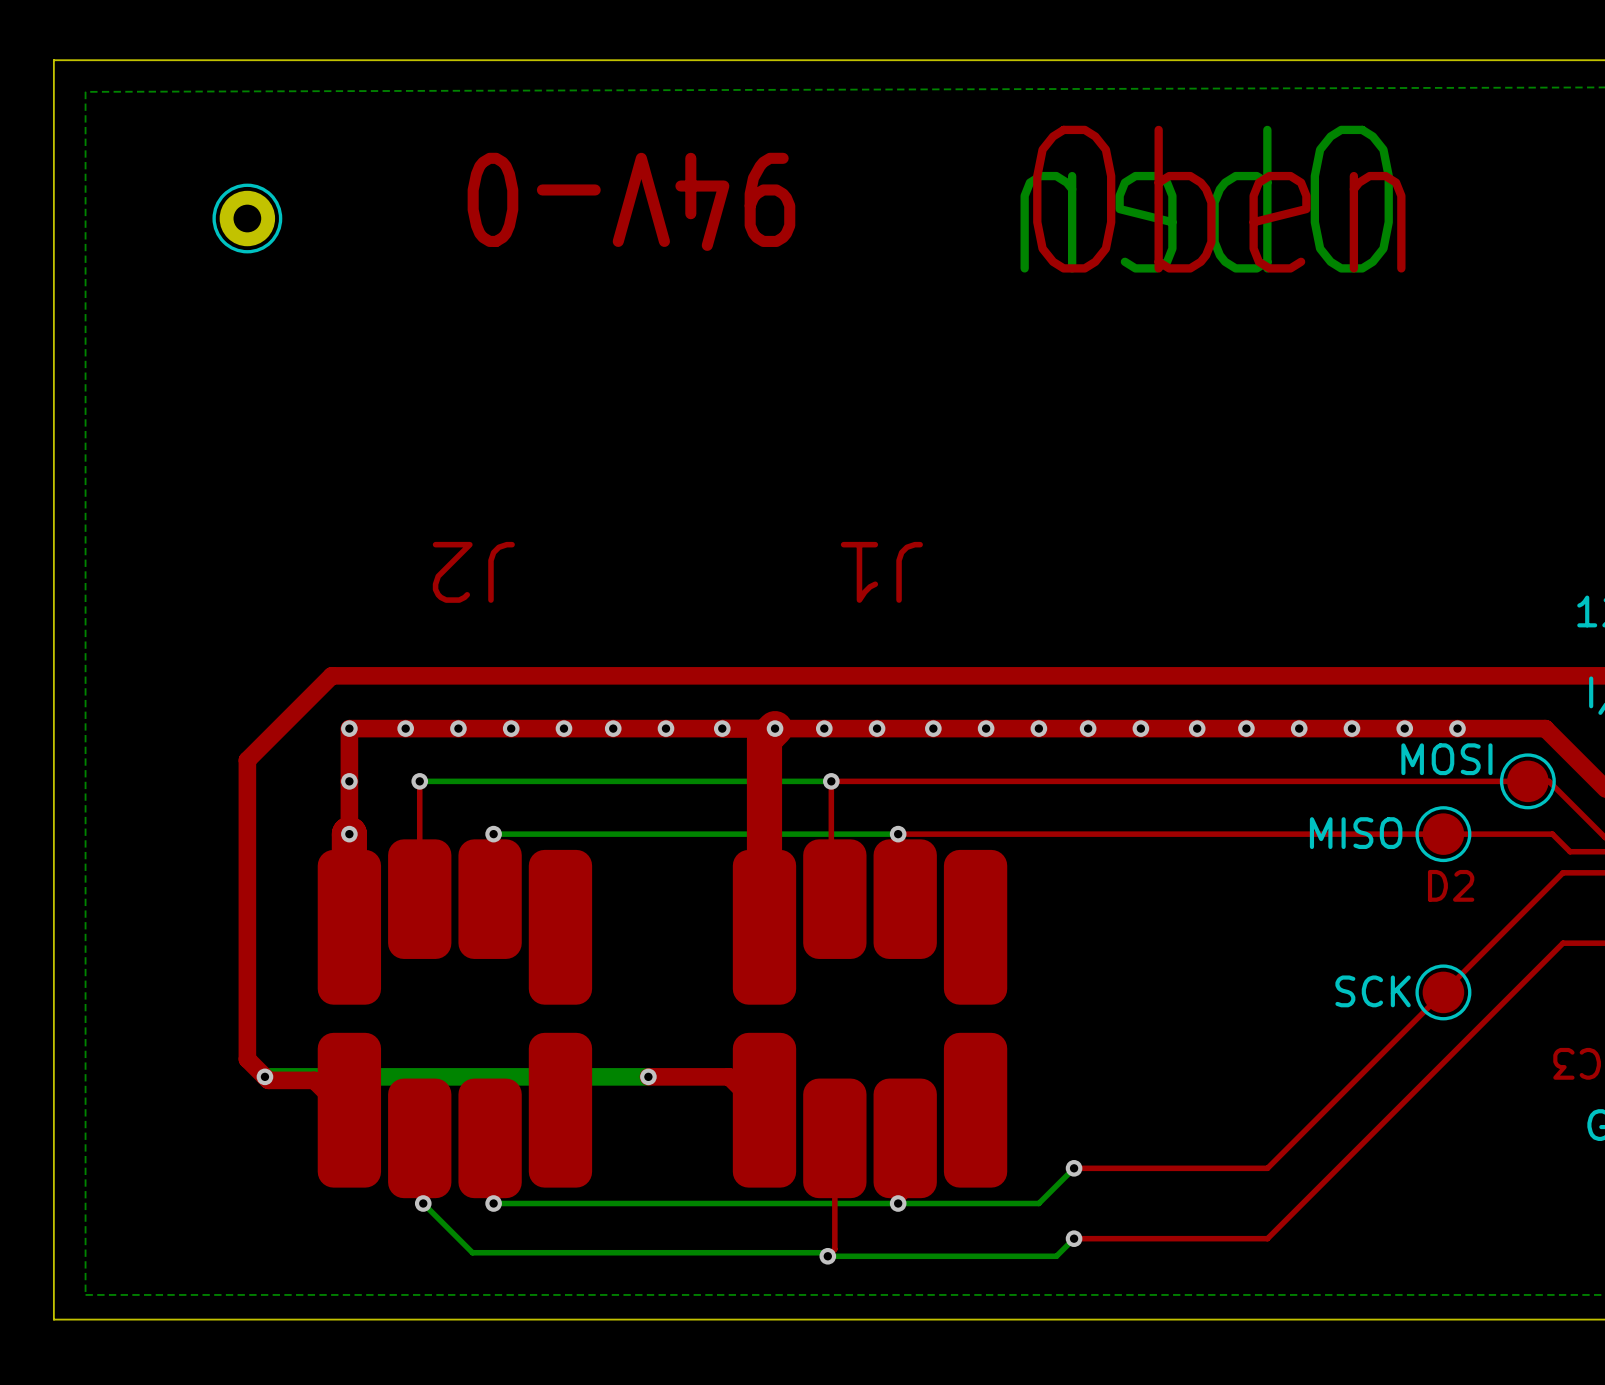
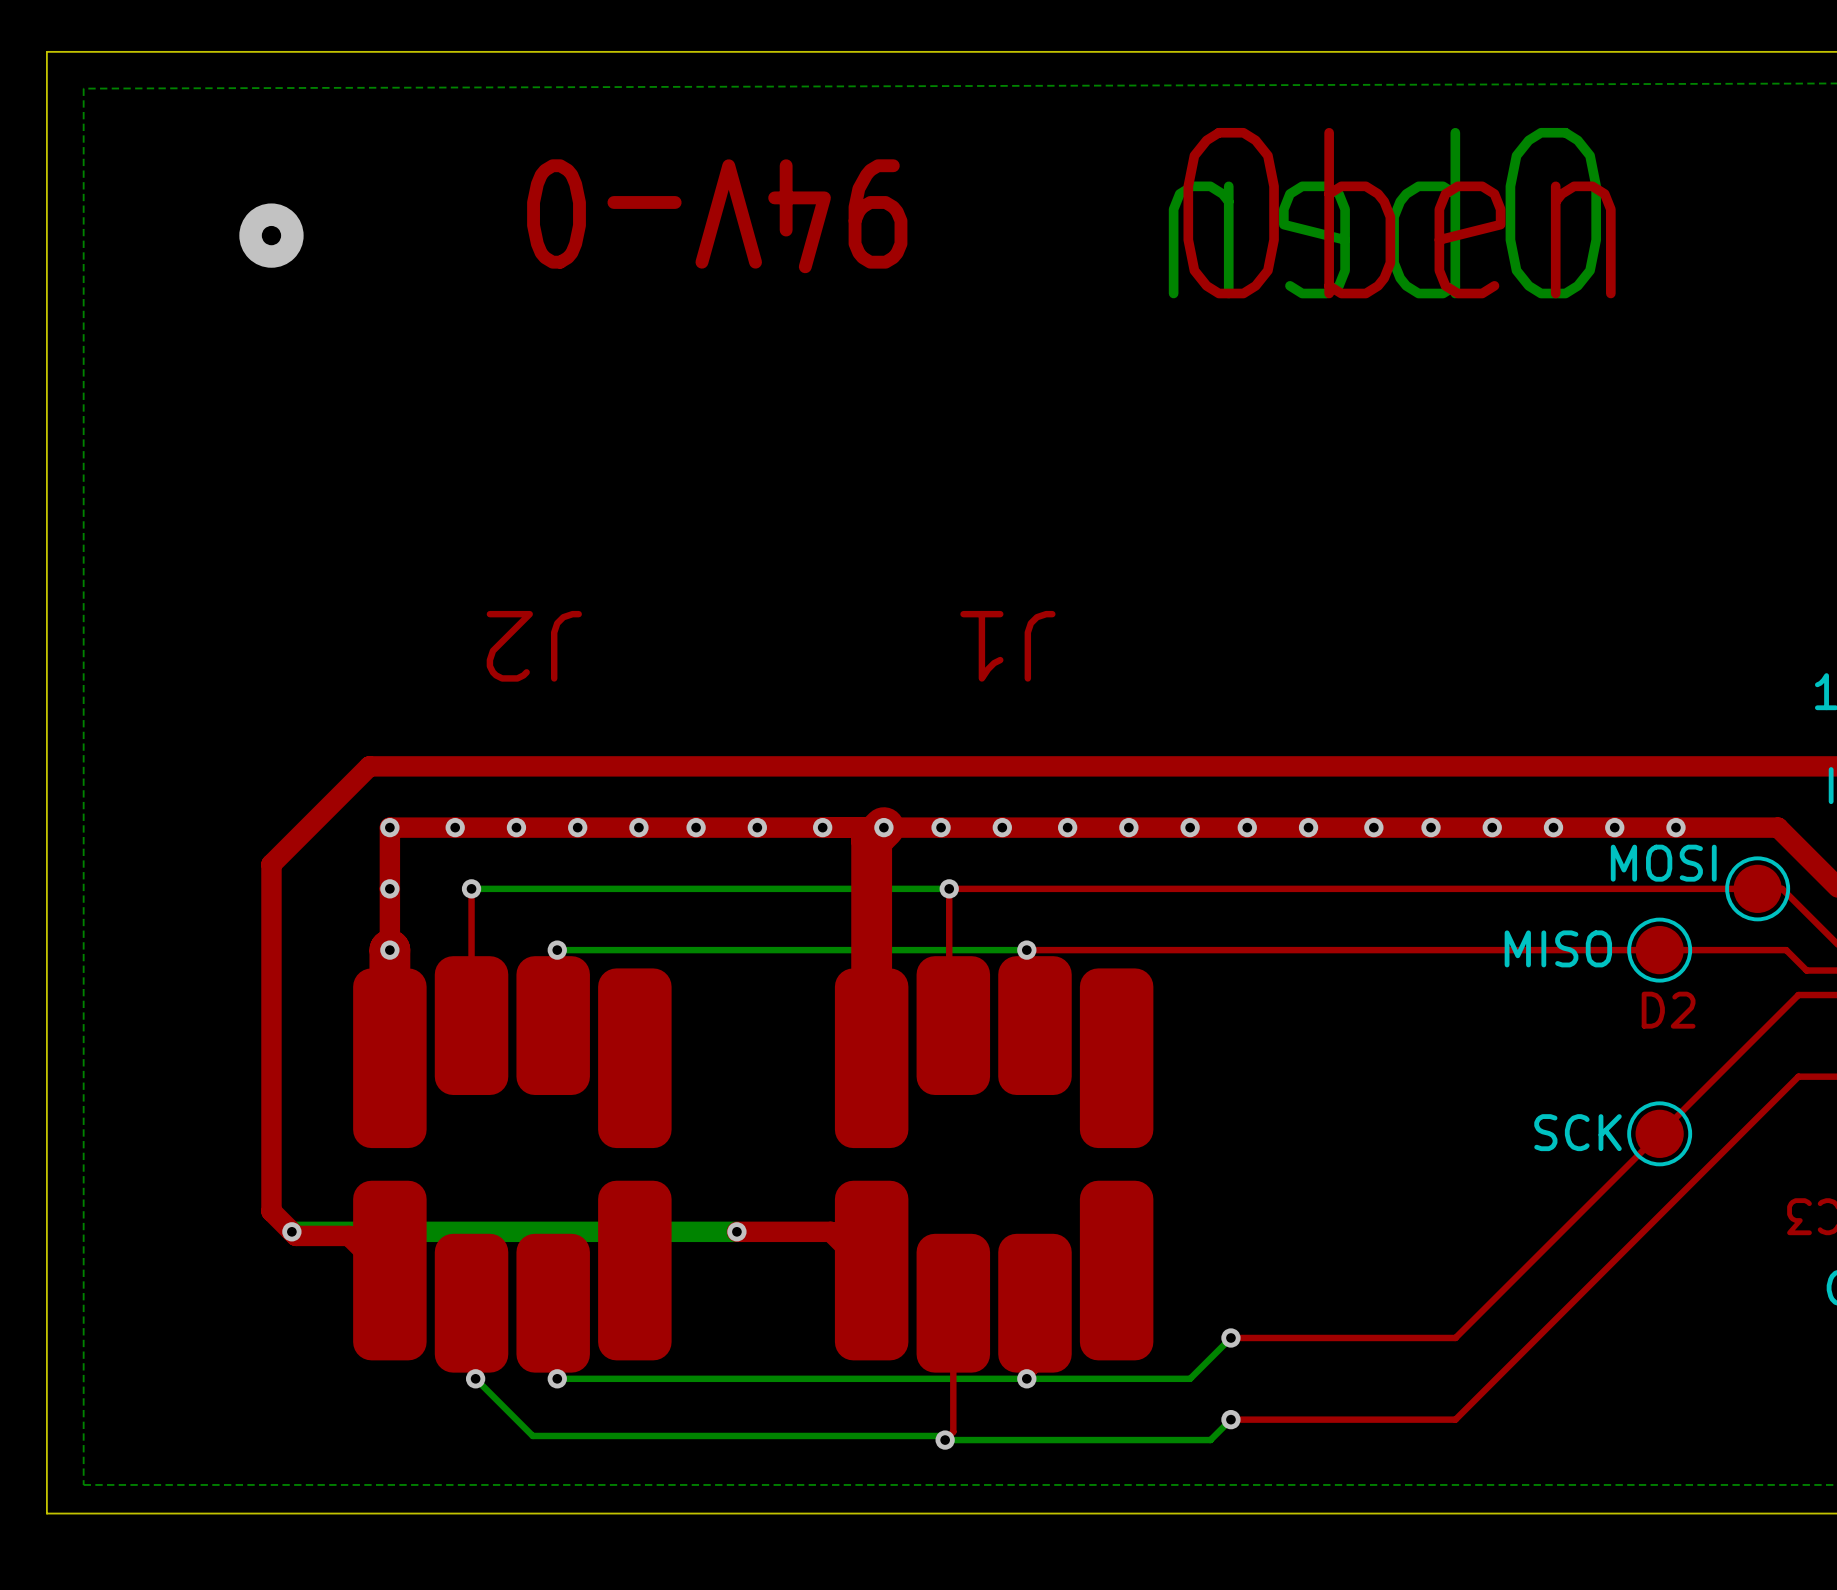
part: (247, 218) -> none
via: none -> (271, 235)

